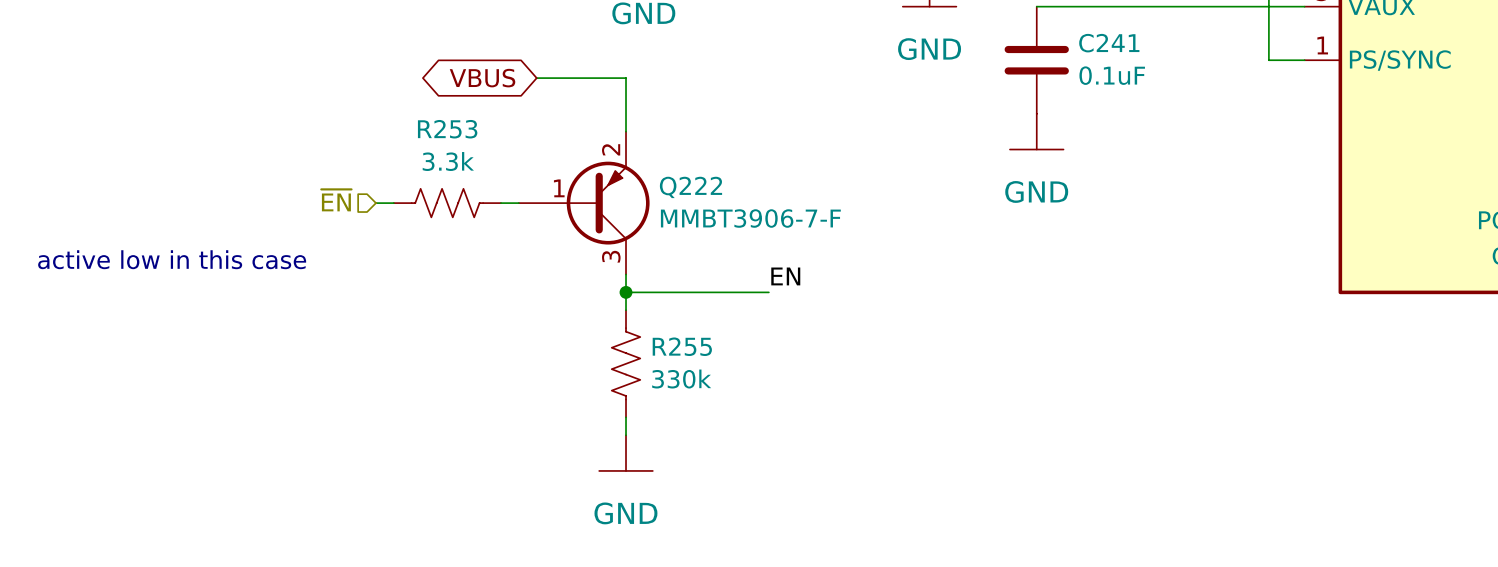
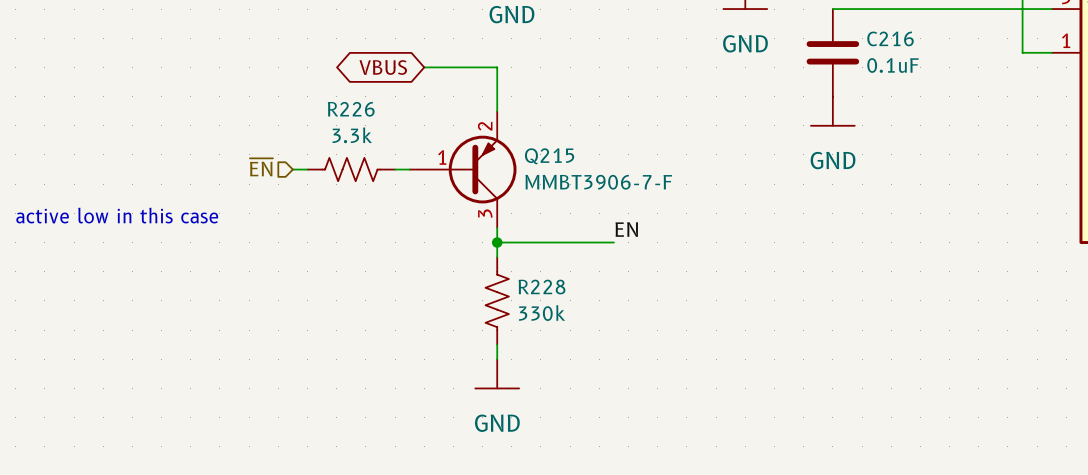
C241 name: C241 (1109, 43) -> C216 (890, 38)
R253 name: R253 (447, 129) -> R226 (351, 109)
Q222 name: Q222 (690, 187) -> Q215 (549, 156)
R255 name: R255 (682, 346) -> R228 (541, 287)

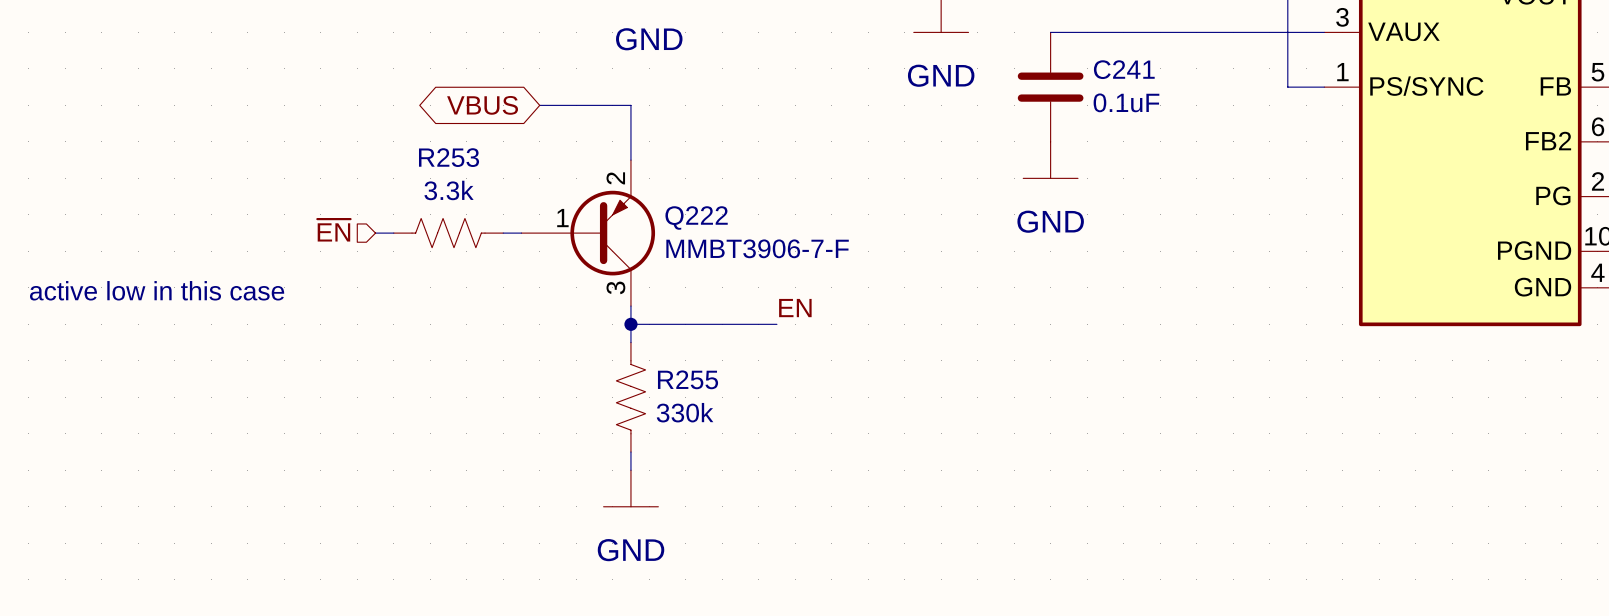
C216 name: C216 (890, 38) -> C241 (1124, 69)
R226 name: R226 (351, 109) -> R253 (449, 157)
Q215 name: Q215 (549, 156) -> Q222 (696, 218)
R228 name: R228 (541, 287) -> R255 (688, 379)

